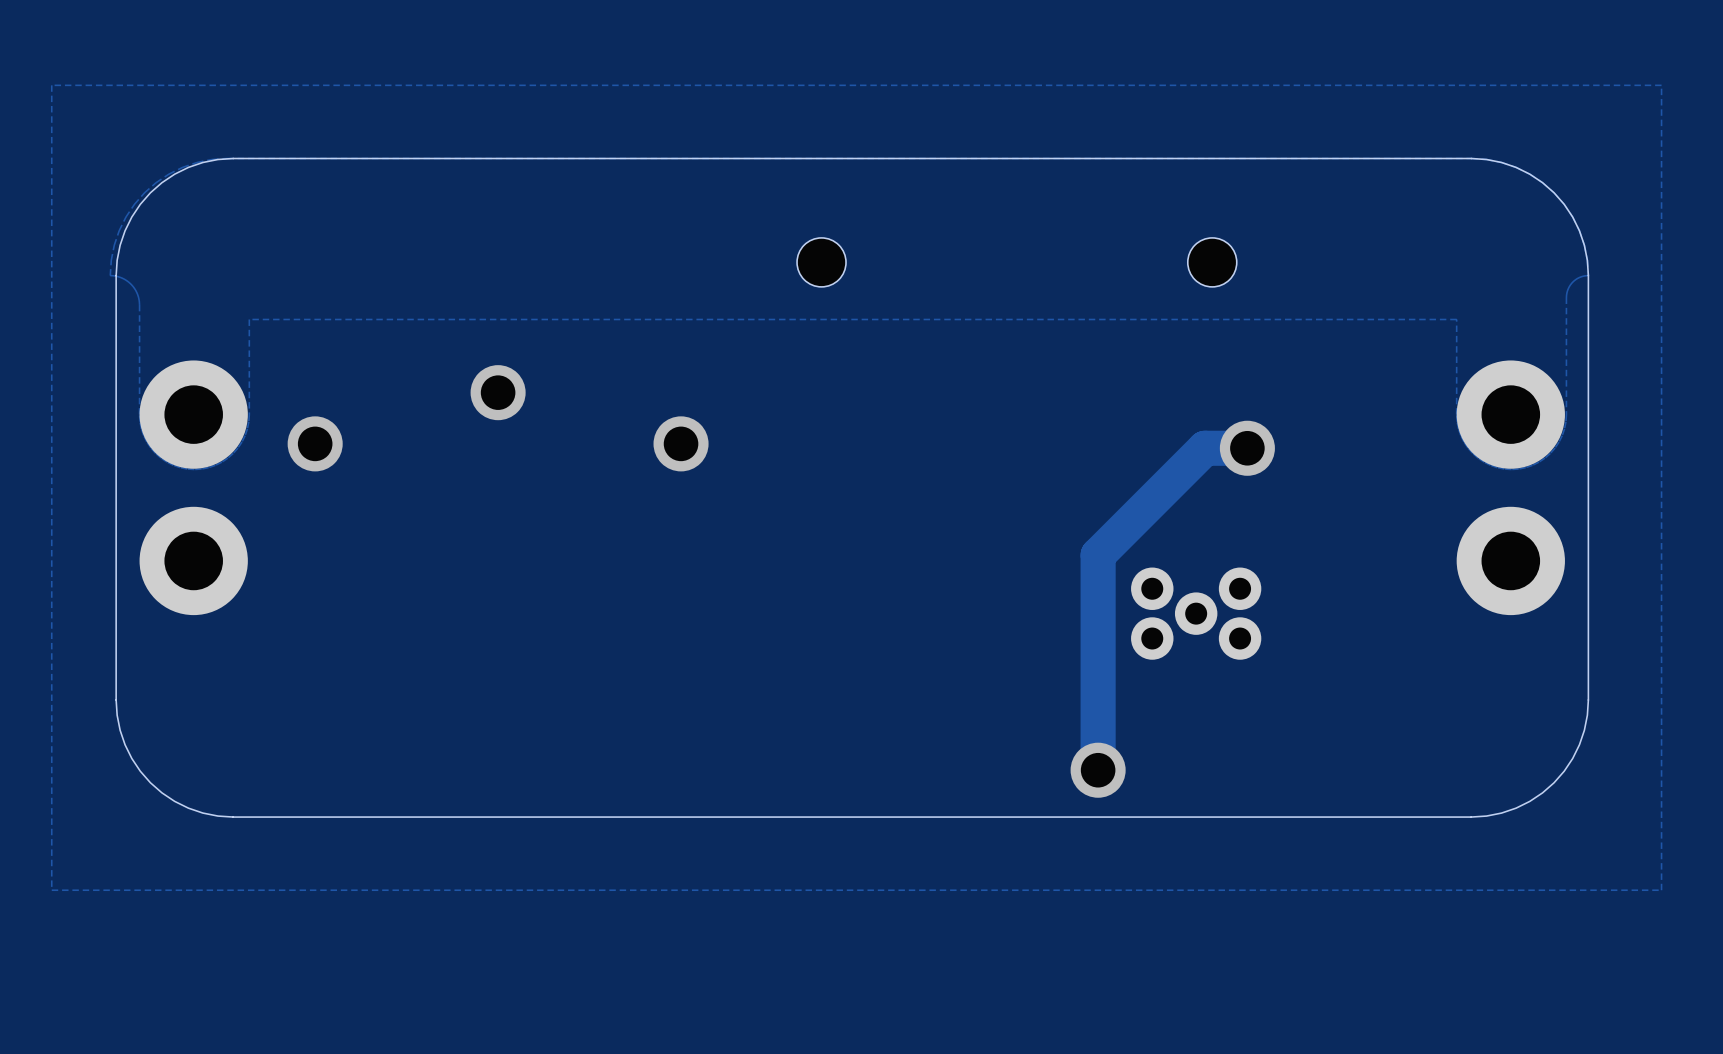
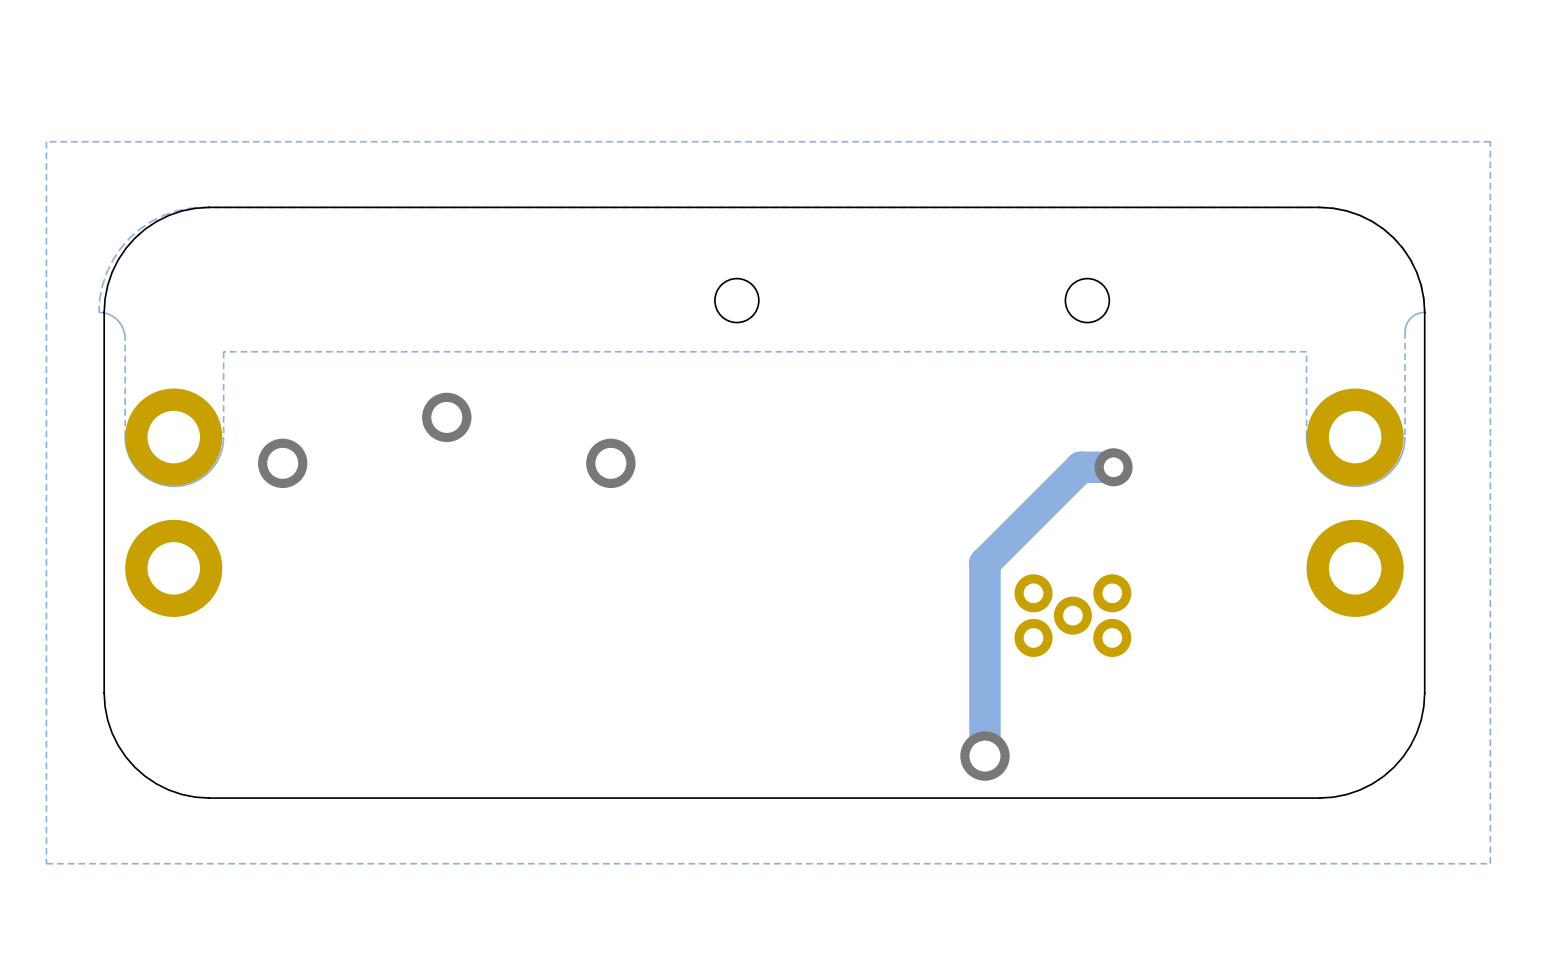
via size: [1219, 420, 1275, 476] -> [1094, 448, 1133, 487]

